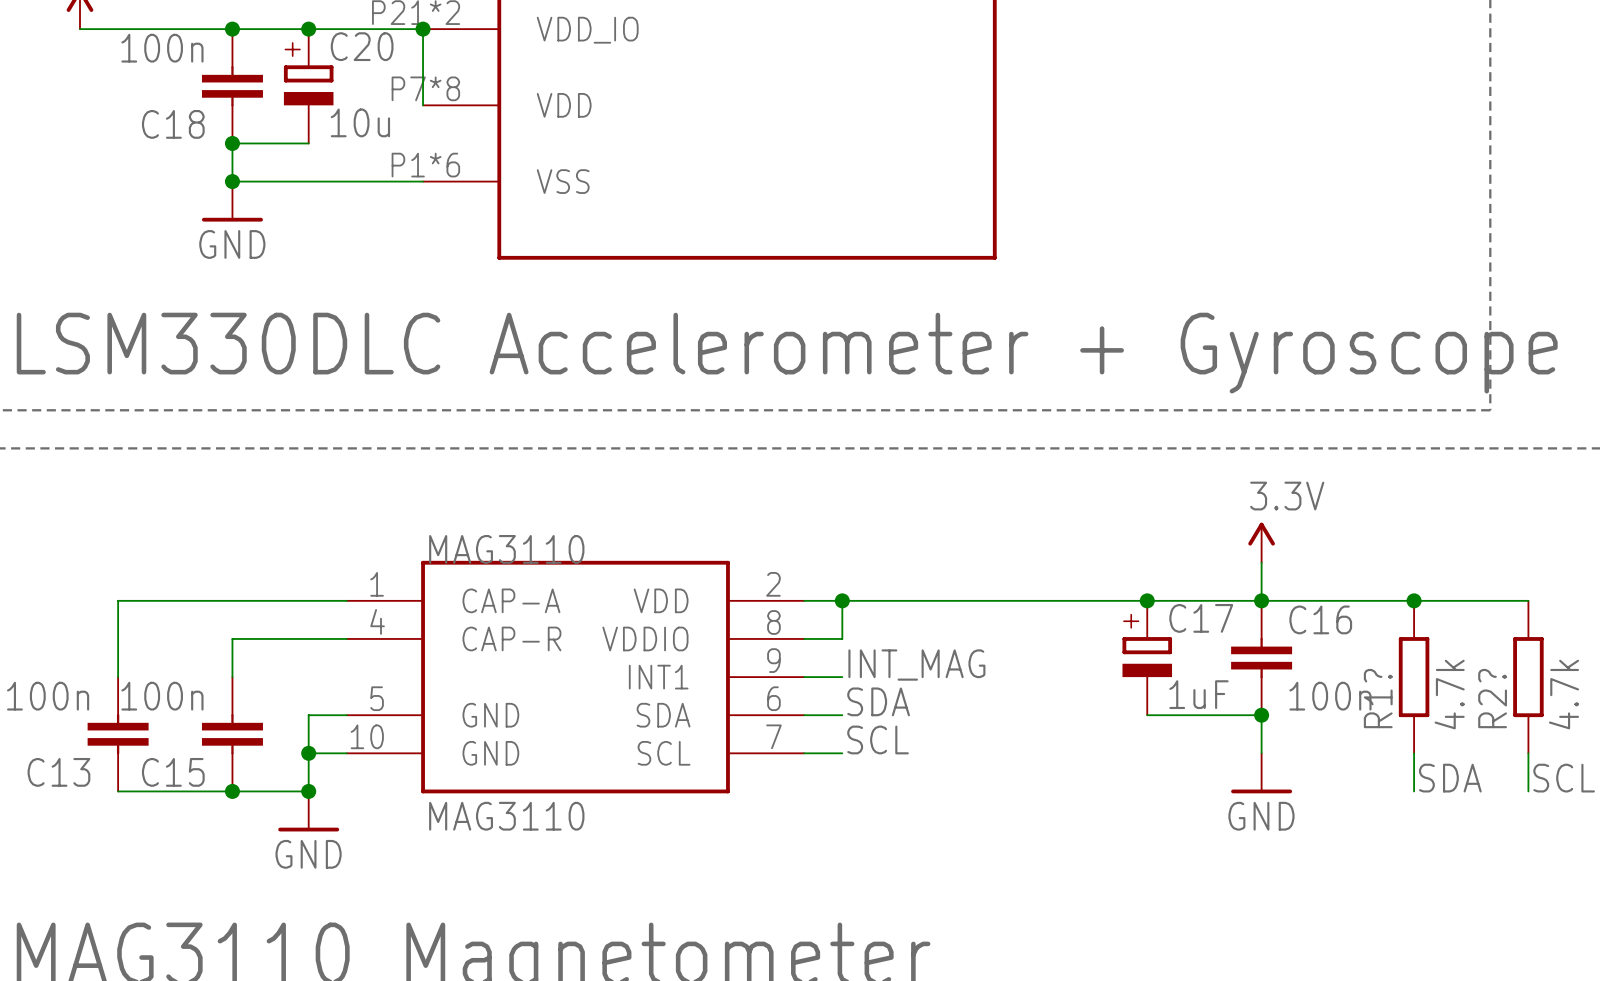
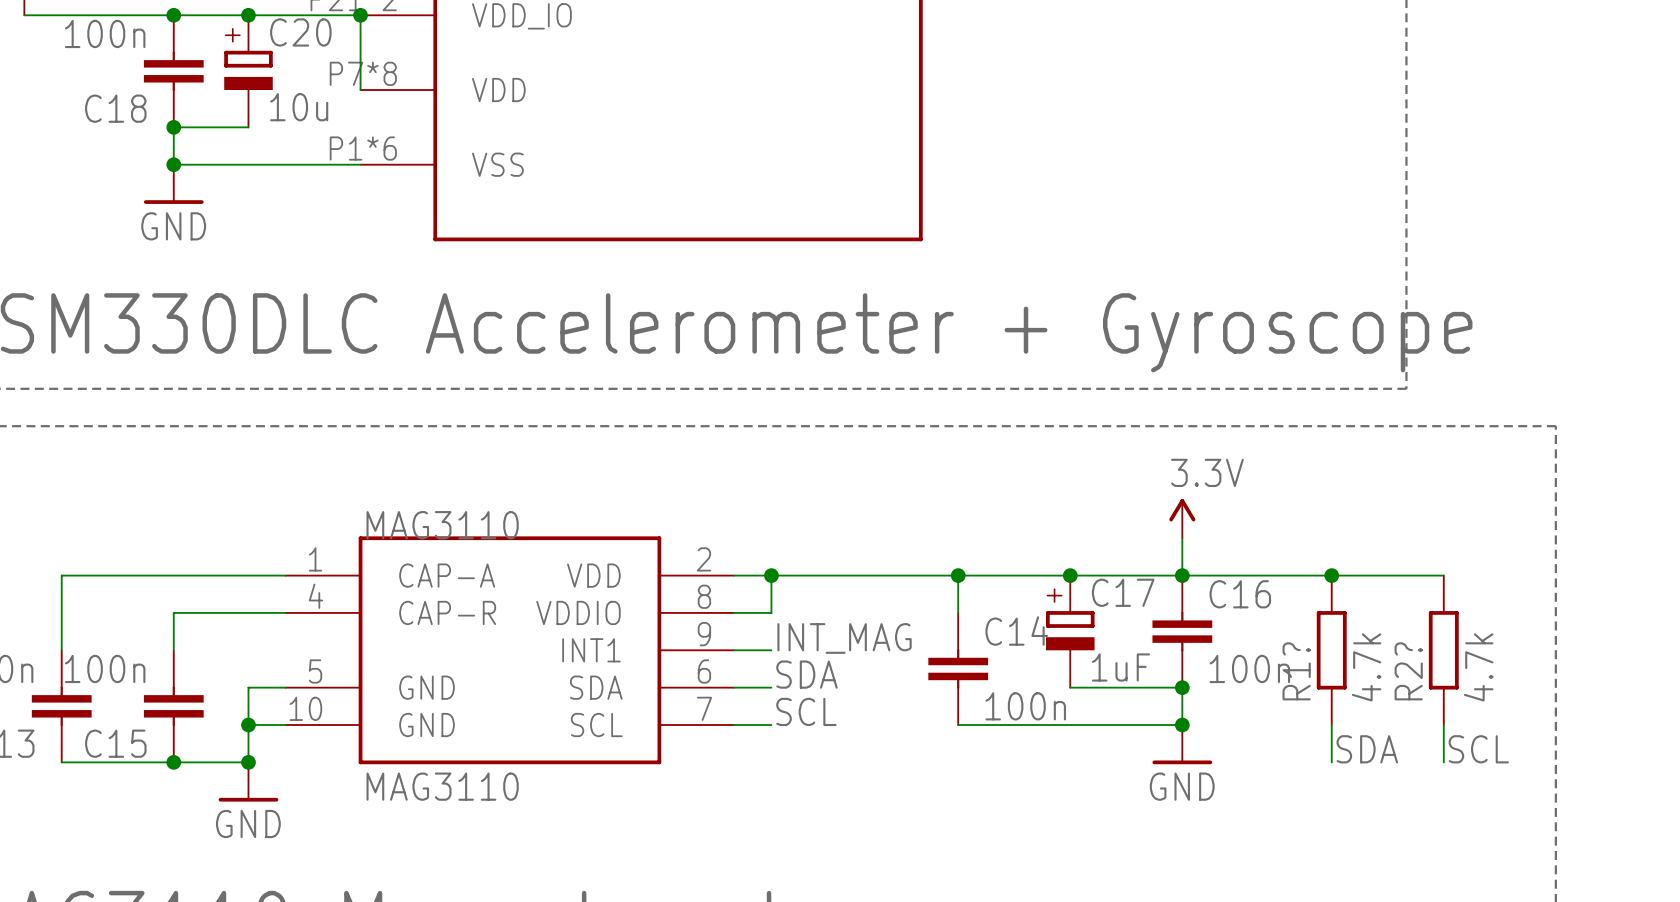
wire: none -> (958, 575) (958, 612)
junction: none -> (958, 575)
C14: none -> 100n (958, 668)
wire: none -> (958, 725) (1182, 725)
junction: none -> (1182, 725)

